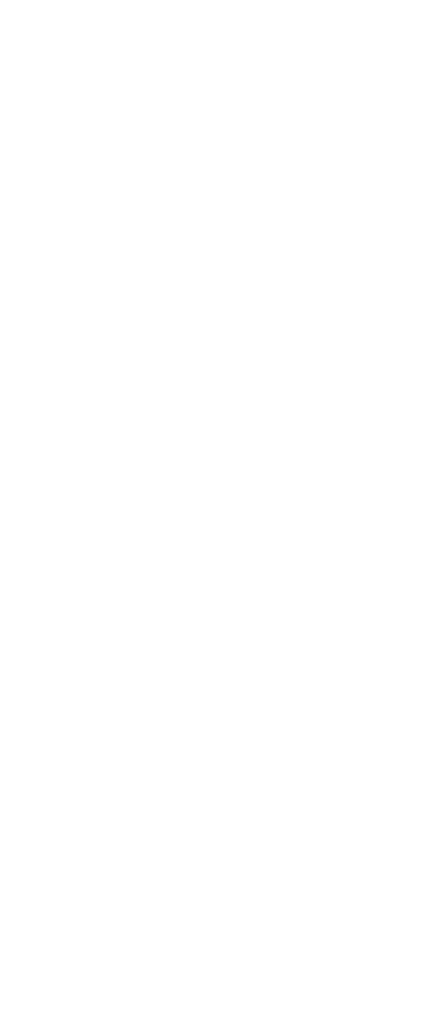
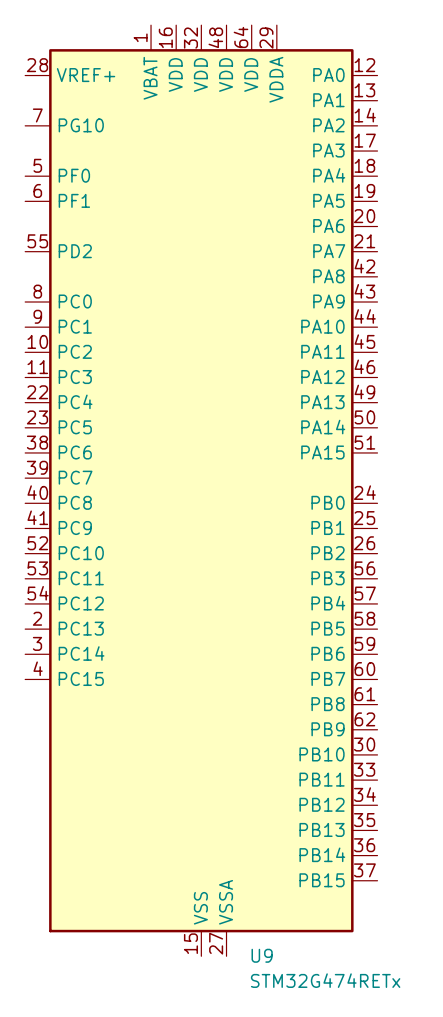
U9: none -> STM32G474RETx (201, 490)

